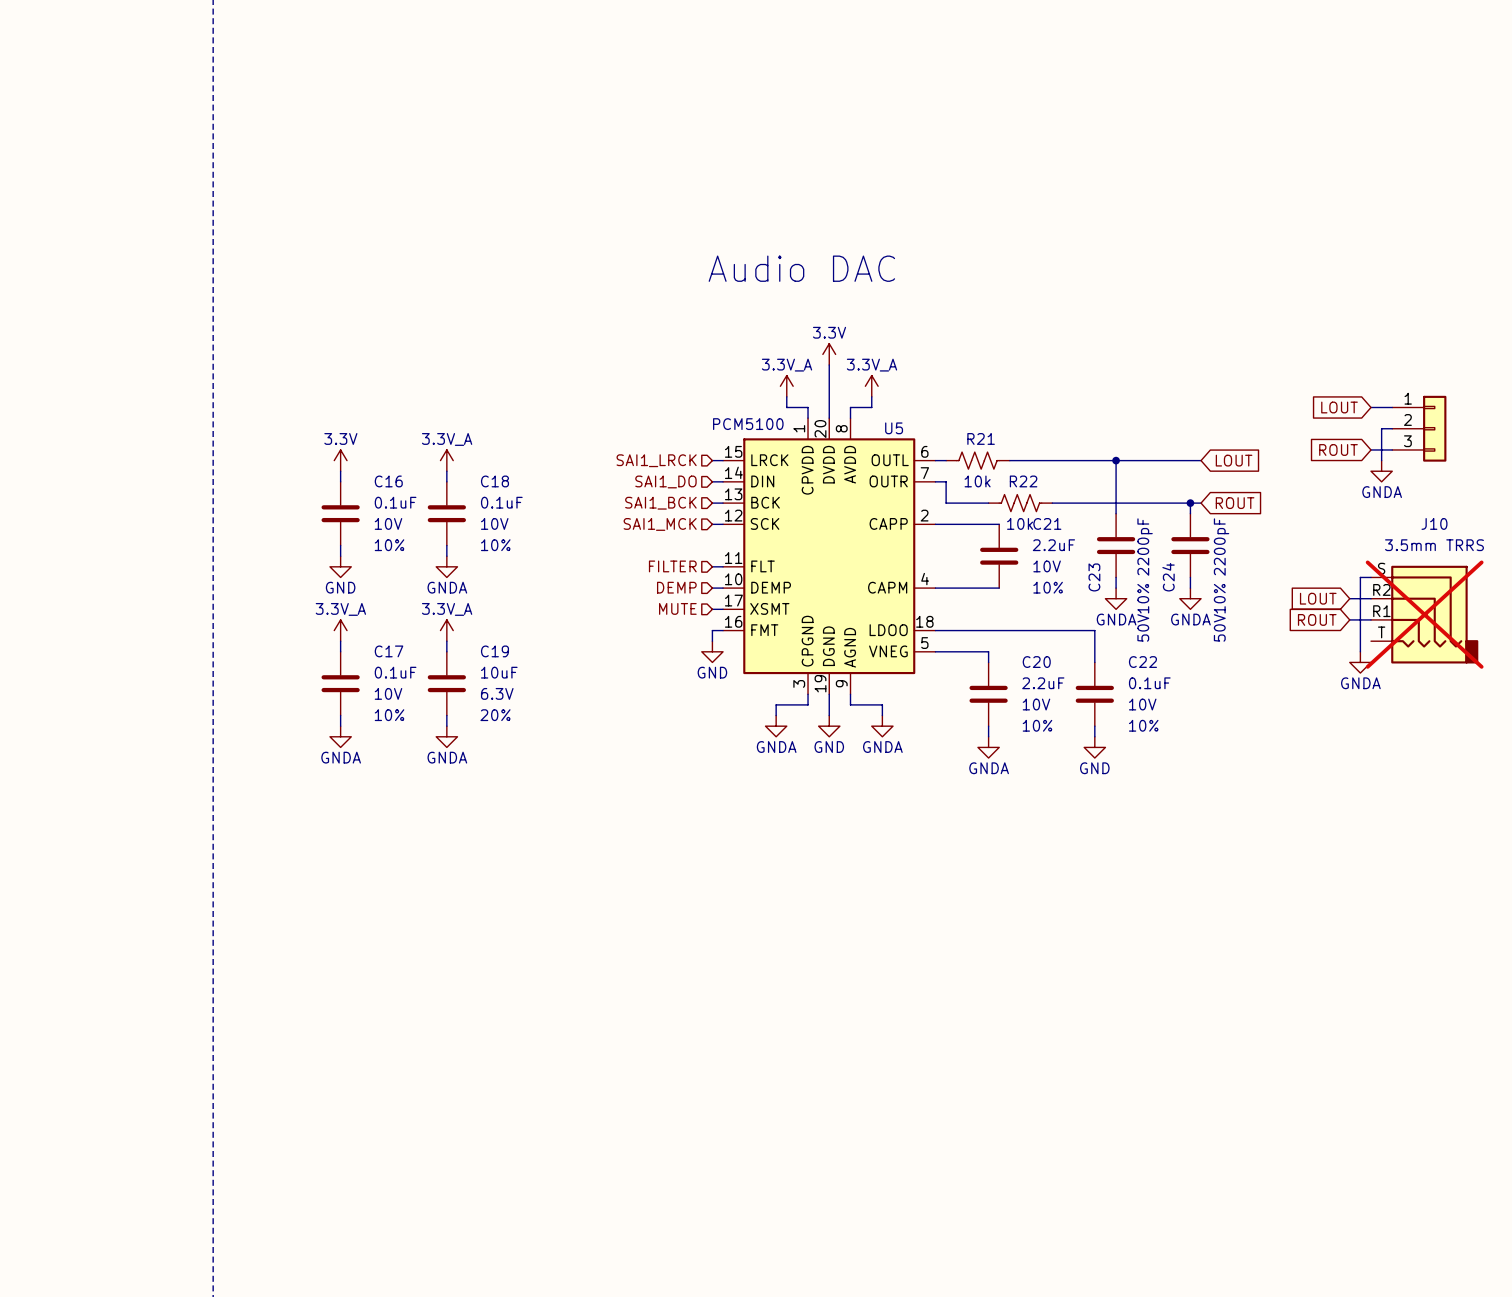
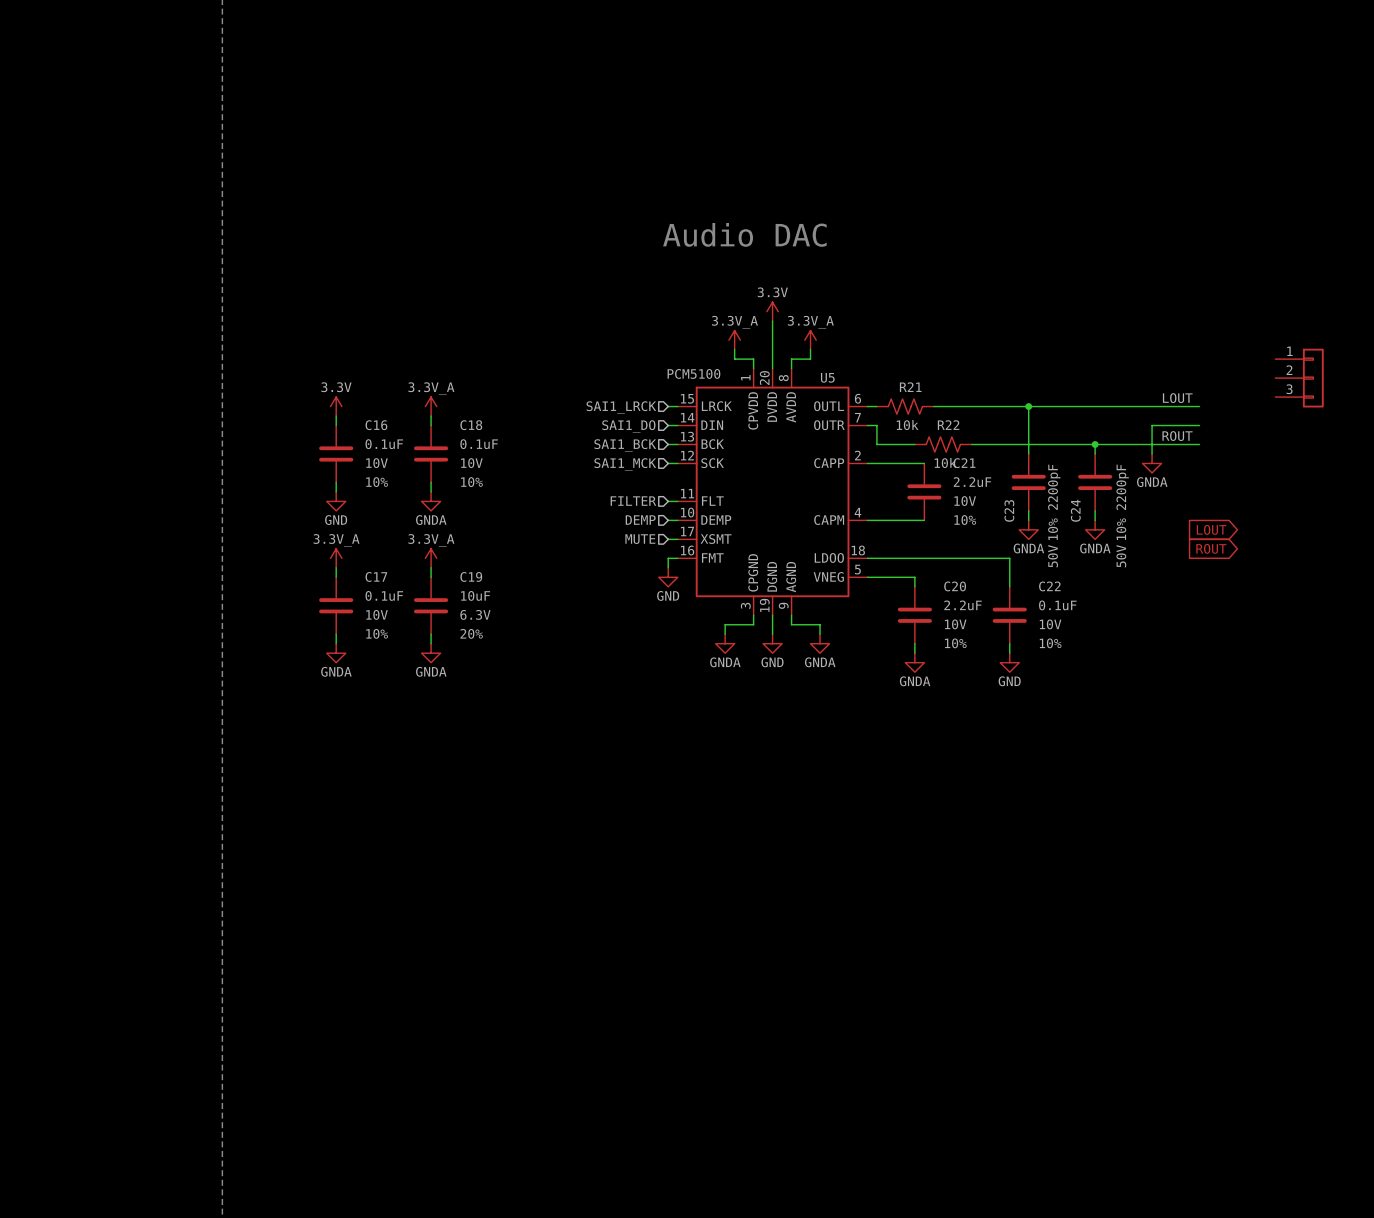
global label: LOUT (1339, 407) -> none
wire: (1371, 407) (1392, 407) -> none
wire: (1392, 428) (1381, 428) (1381, 460) -> none
global label: ROUT (1338, 449) -> none
wire: (1371, 449) (1392, 449) -> none
label: none -> LOUT (1177, 398)
wire: none -> (1104, 406) (1199, 406)
global label: LOUT (1234, 460) -> none
power symbol: GNDA (1381, 471) -> none
wire: none -> (1199, 425) (1152, 425) (1152, 453)
label: none -> ROUT (1177, 436)
wire: none -> (1104, 444) (1199, 444)
global label: ROUT (1235, 503) -> none
power symbol: none -> GNDA (1152, 463)
wire: (1371, 577) (1360, 577) (1360, 651) -> none
wire: (1349, 598) (1371, 598) -> none
J10: 3.5mm TRRS (1424, 614) -> none
wire: (1349, 619) (1371, 619) -> none
power symbol: GNDA (1360, 662) -> none

